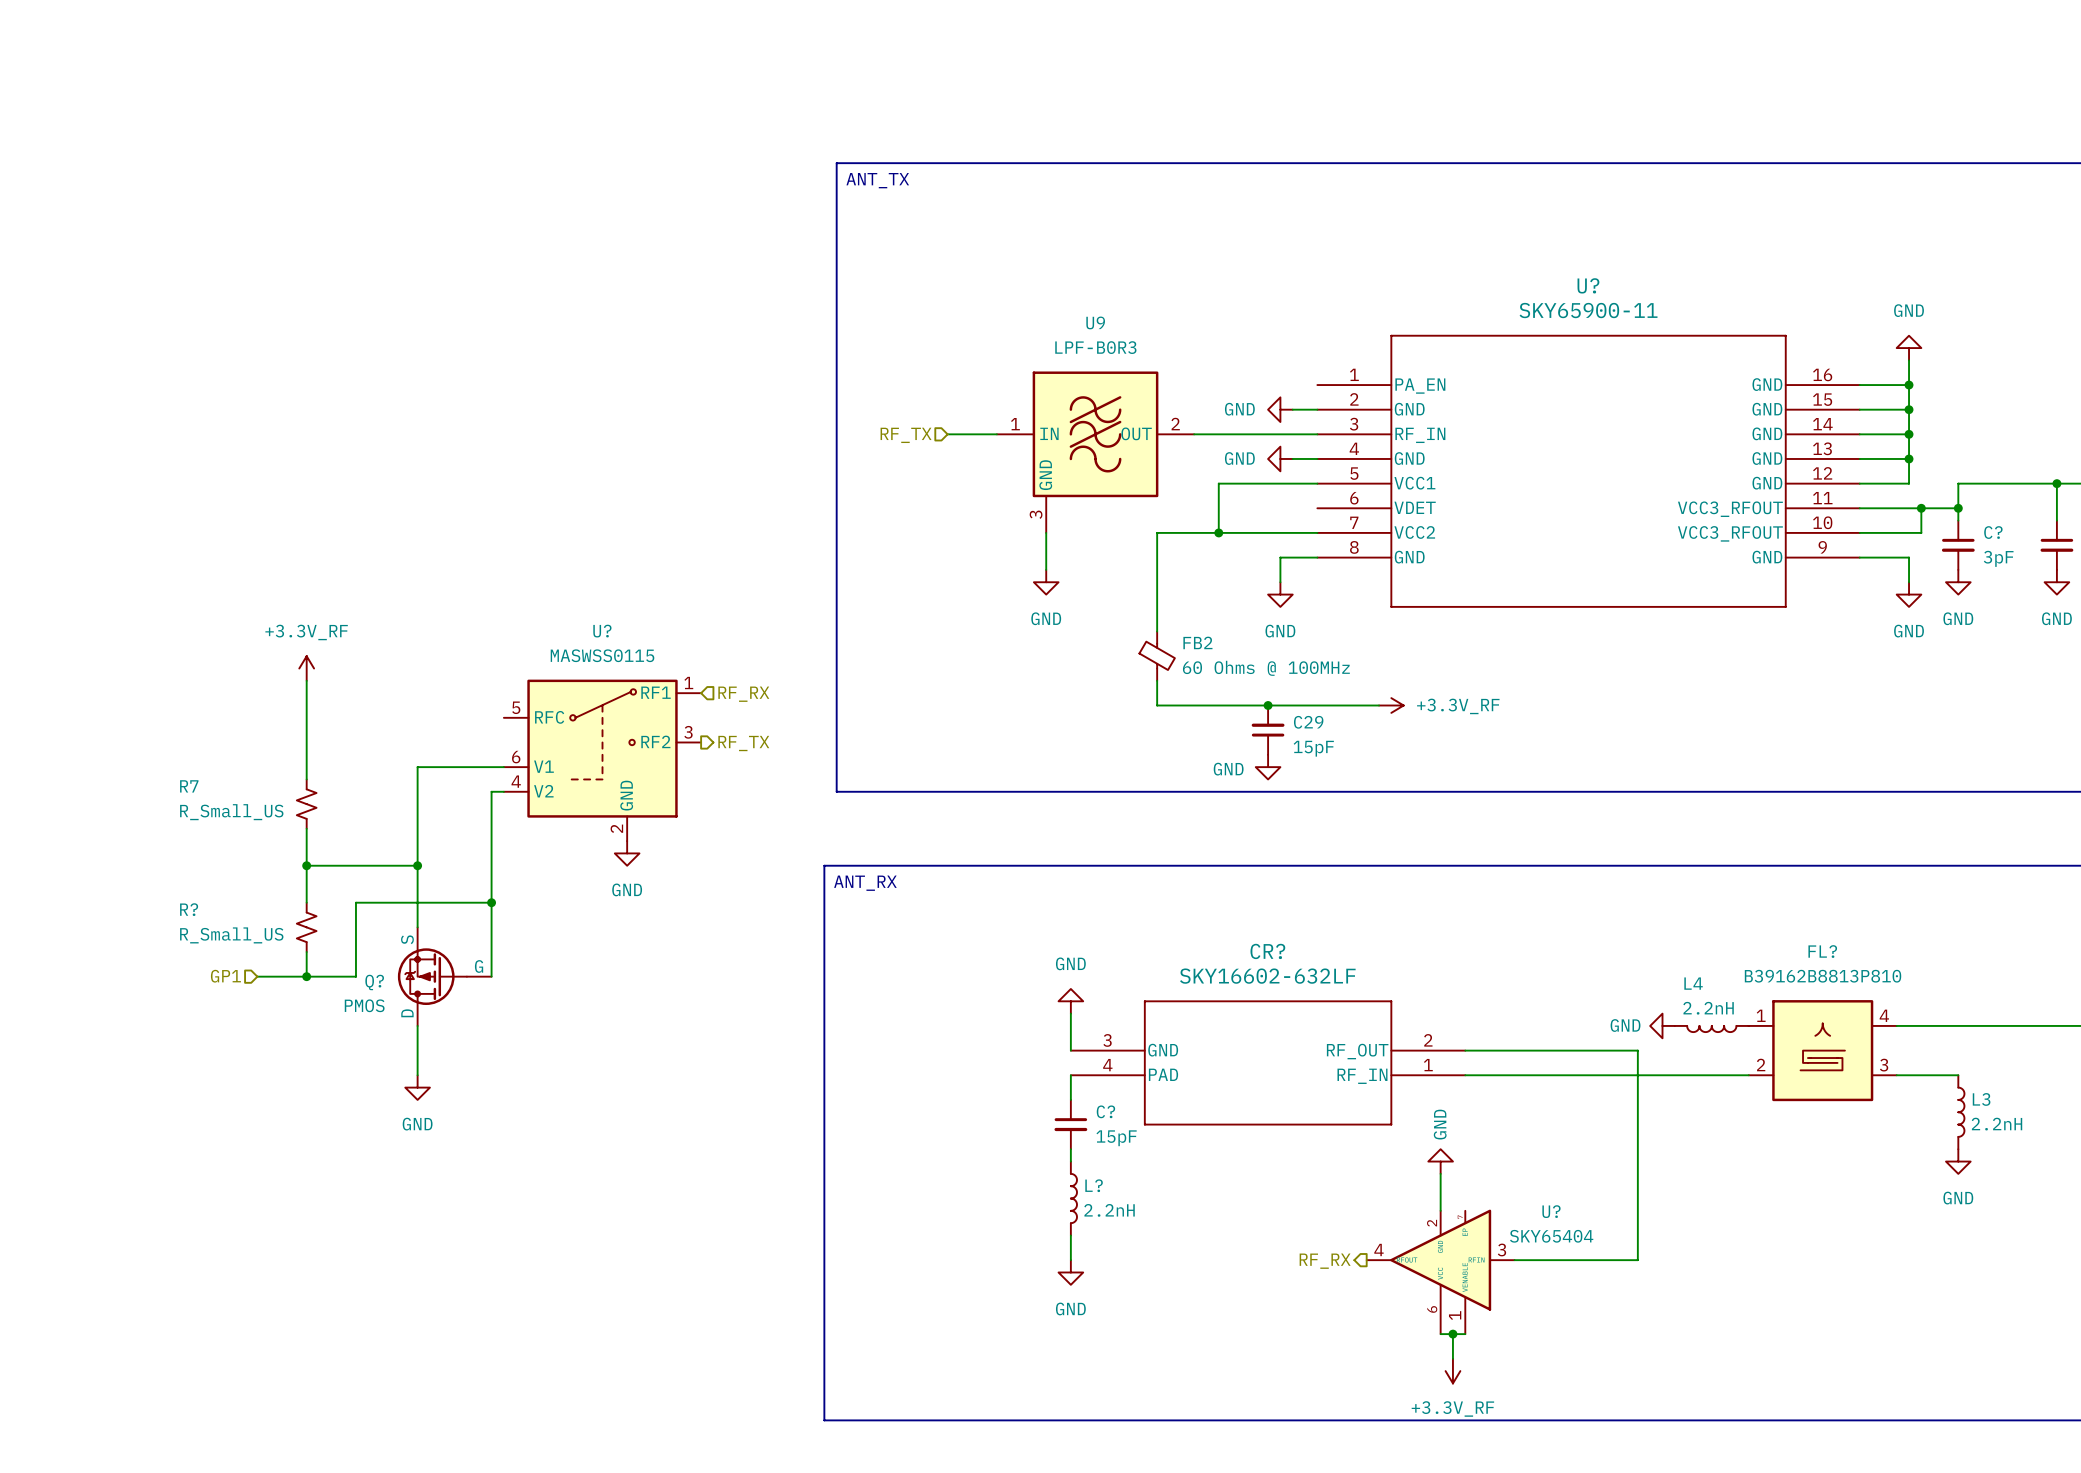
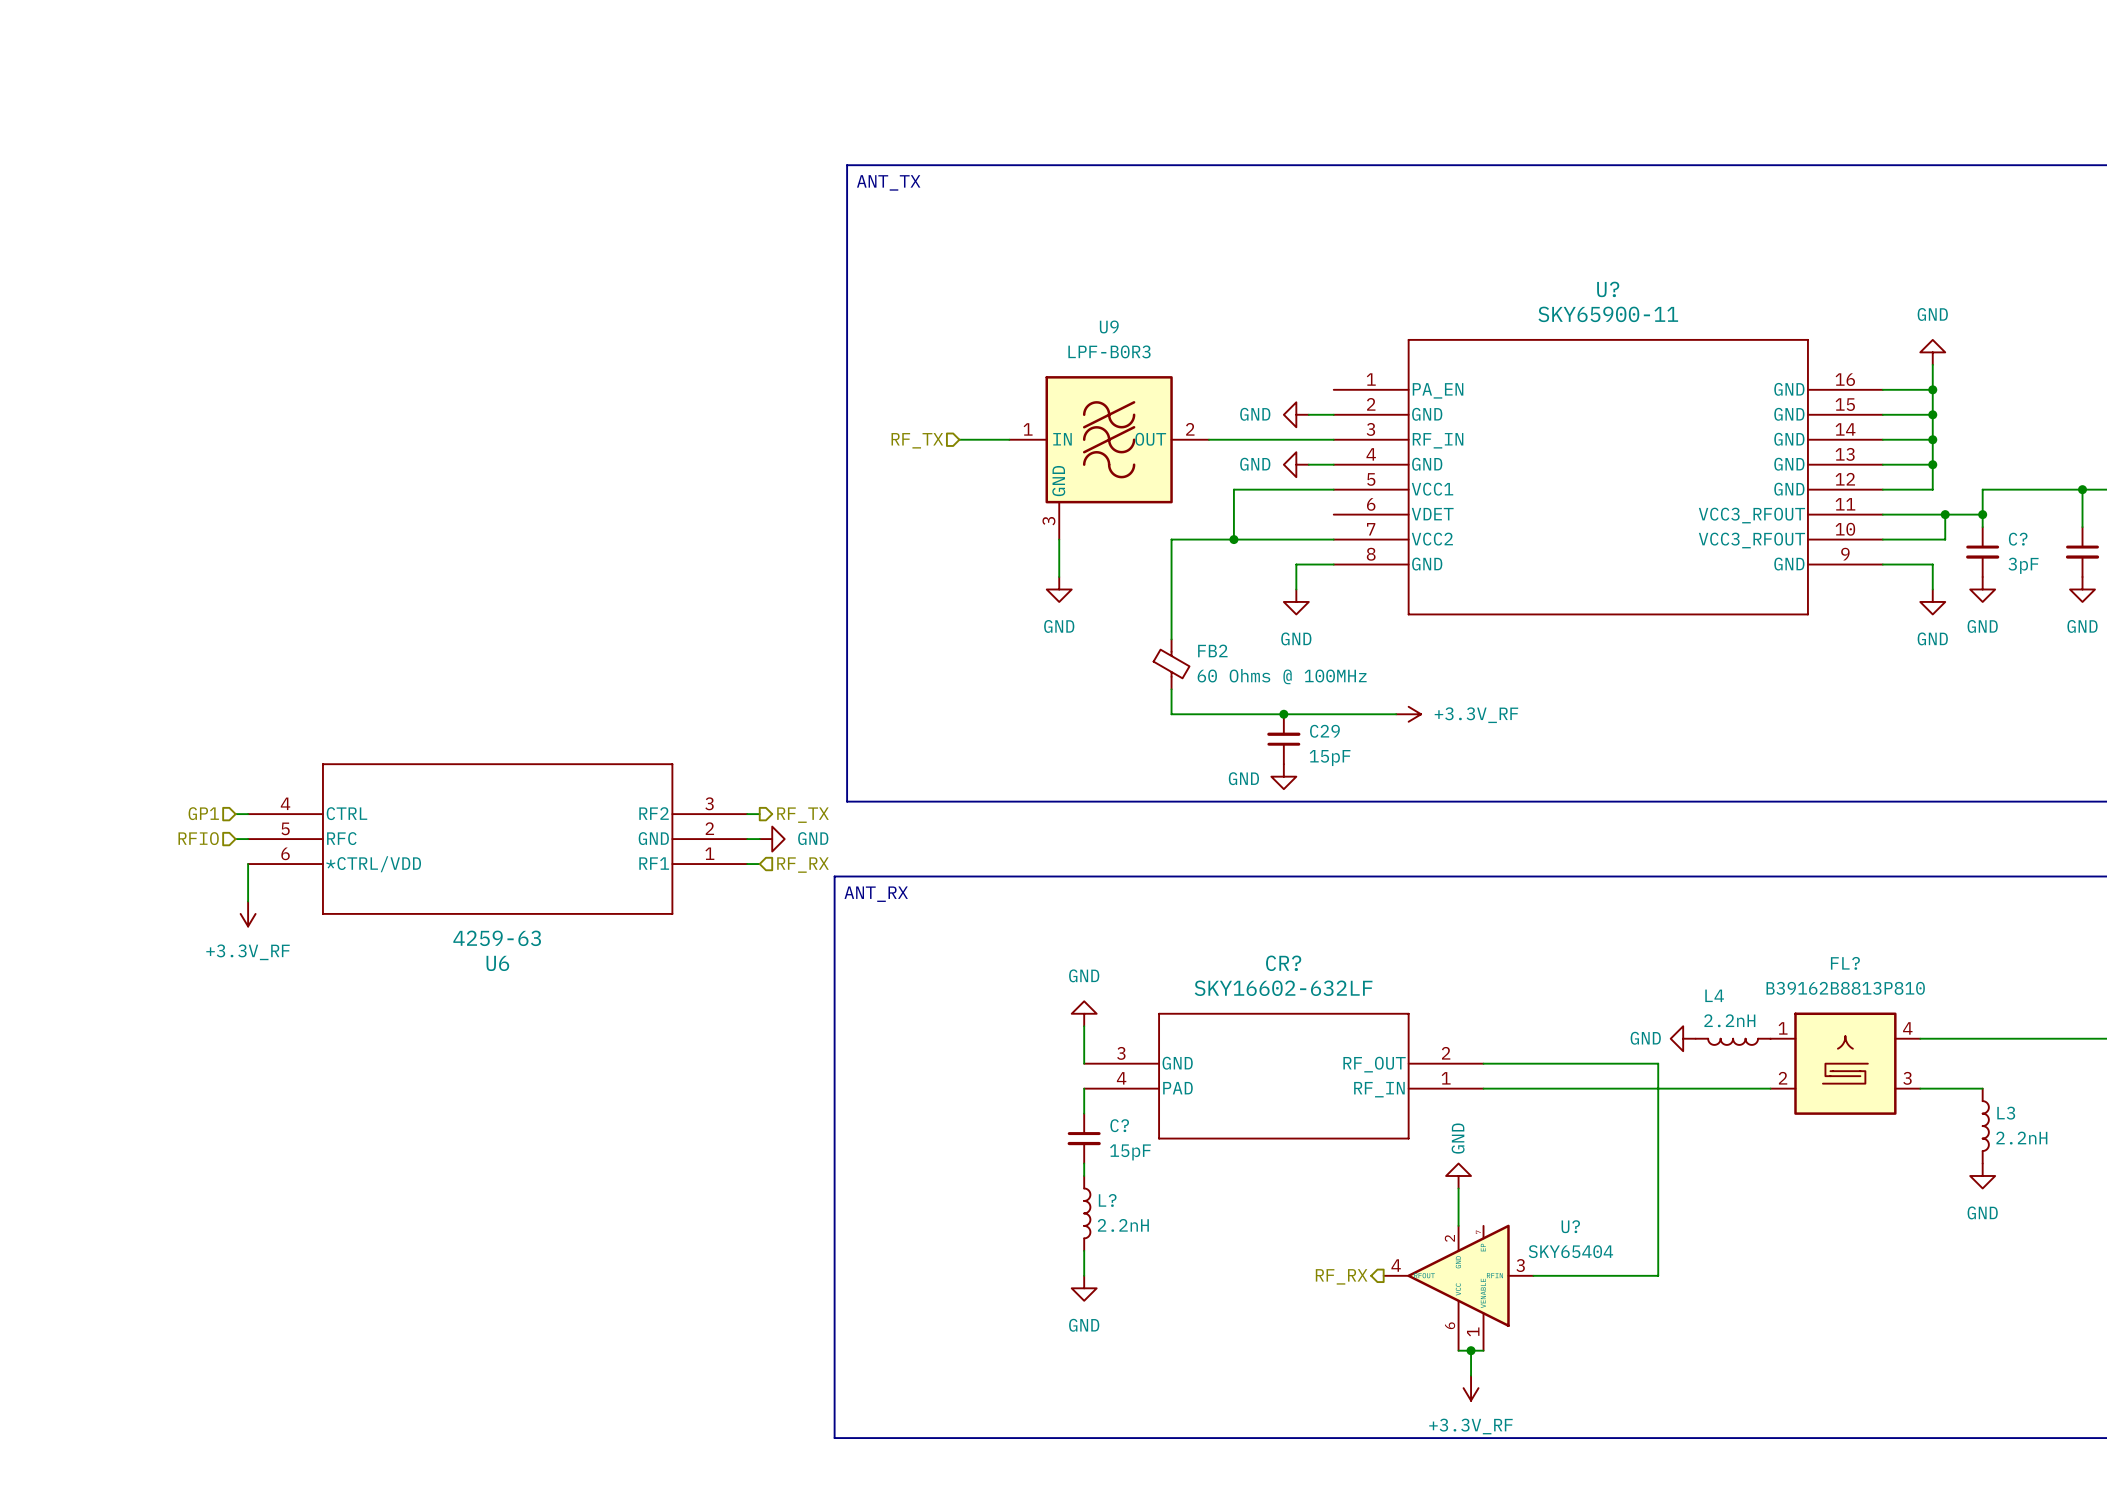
power symbol rotation: 0° (306, 668) -> 180° (248, 913)
power symbol position: +3.3V_RF (306, 668) -> +3.3V_RF (248, 913)
wire: (306, 680) (306, 779) -> none
hierarchical label position: RF_RX (743, 694) -> RF_RX (802, 865)
hierarchical label position: RF_TX (743, 743) -> RF_TX (802, 815)
U?: MASWSS0115 (602, 760) -> none
wire: (503, 767) (417, 767) (417, 927) -> none
wire: (503, 791) (491, 791) (491, 976) -> none
wire: none -> (235, 814) (248, 814)
R7: R_Small_US (306, 804) -> none
wire: none -> (747, 814) (759, 814)
hierarchical label: none -> RFIO (198, 838)
wire: none -> (235, 839) (248, 839)
wire: (306, 828) (306, 902) -> none
U6: none -> 4259-63 (497, 839)
wire: none -> (747, 839) (759, 839)
wire: none -> (248, 864) (248, 901)
power symbol rotation: 0° (627, 853) -> 90° counterclockwise (772, 839)
power symbol position: GND (627, 853) -> GND (772, 839)
wire: none -> (747, 864) (759, 864)
wire: (306, 865) (417, 865) -> none
junction: (306, 865) -> none
junction: (417, 865) -> none
wire: (491, 902) (355, 902) (355, 976) (257, 976) -> none
junction: (491, 902) -> none
R?: R_Small_US (306, 927) -> none
wire: (306, 952) (306, 976) -> none
hierarchical label position: GP1 (225, 976) -> GP1 (203, 813)
junction: (306, 976) -> none
Q?: PMOS (444, 976) -> none
wire: (417, 1025) (417, 1075) -> none
power symbol: GND (417, 1087) -> none

